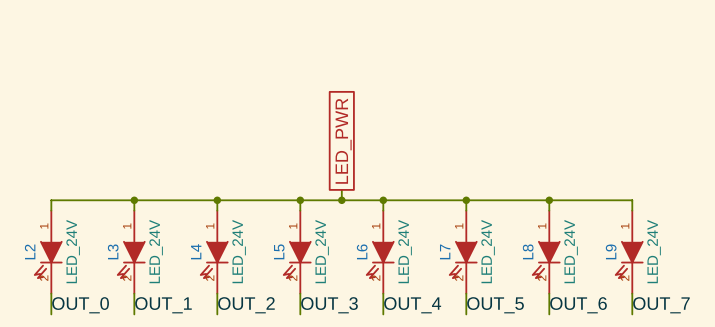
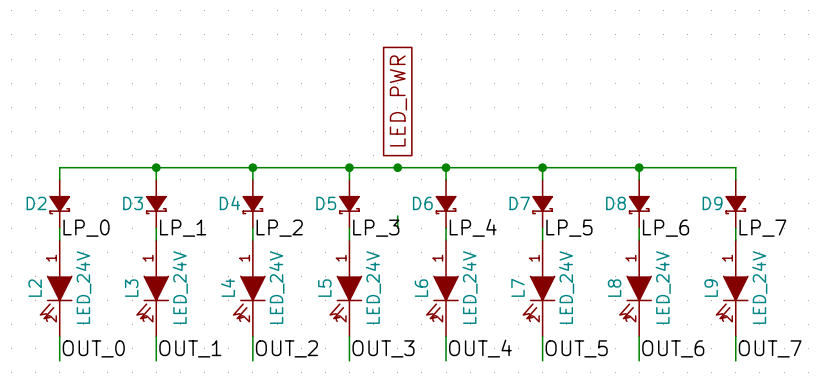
global label position: LED_PWR (343, 141) -> LED_PWR (398, 100)
wire: none -> (156, 167) (156, 179)
junction: none -> (156, 167)
wire: none -> (252, 167) (252, 179)
junction: none -> (252, 167)
wire: none -> (349, 167) (349, 179)
junction: none -> (349, 167)
junction: none -> (397, 167)
wire: none -> (446, 167) (446, 179)
junction: none -> (446, 167)
wire: none -> (542, 167) (542, 179)
junction: none -> (542, 167)
wire: none -> (639, 167) (639, 179)
junction: none -> (639, 167)
wire: none -> (59, 179) (59, 167) (735, 167) (735, 179)
D2: none -> (59, 203)
D3: none -> (156, 203)
D4: none -> (252, 203)
D5: none -> (349, 203)
D6: none -> (446, 203)
D7: none -> (542, 203)
D8: none -> (639, 203)
D9: none -> (735, 203)
wire: (51, 200) (632, 200) -> none
junction: (134, 200) -> none
junction: (217, 200) -> none
junction: (300, 200) -> none
junction: (341, 200) -> none
junction: (383, 200) -> none
junction: (466, 200) -> none
junction: (549, 200) -> none
label: none -> LP_0 (86, 228)
label: none -> LP_1 (183, 228)
label: none -> LP_2 (279, 228)
label: none -> LP_3 (376, 228)
label: none -> LP_4 (473, 227)
label: none -> LP_5 (569, 228)
label: none -> LP_6 (665, 228)
label: none -> LP_7 (762, 228)

